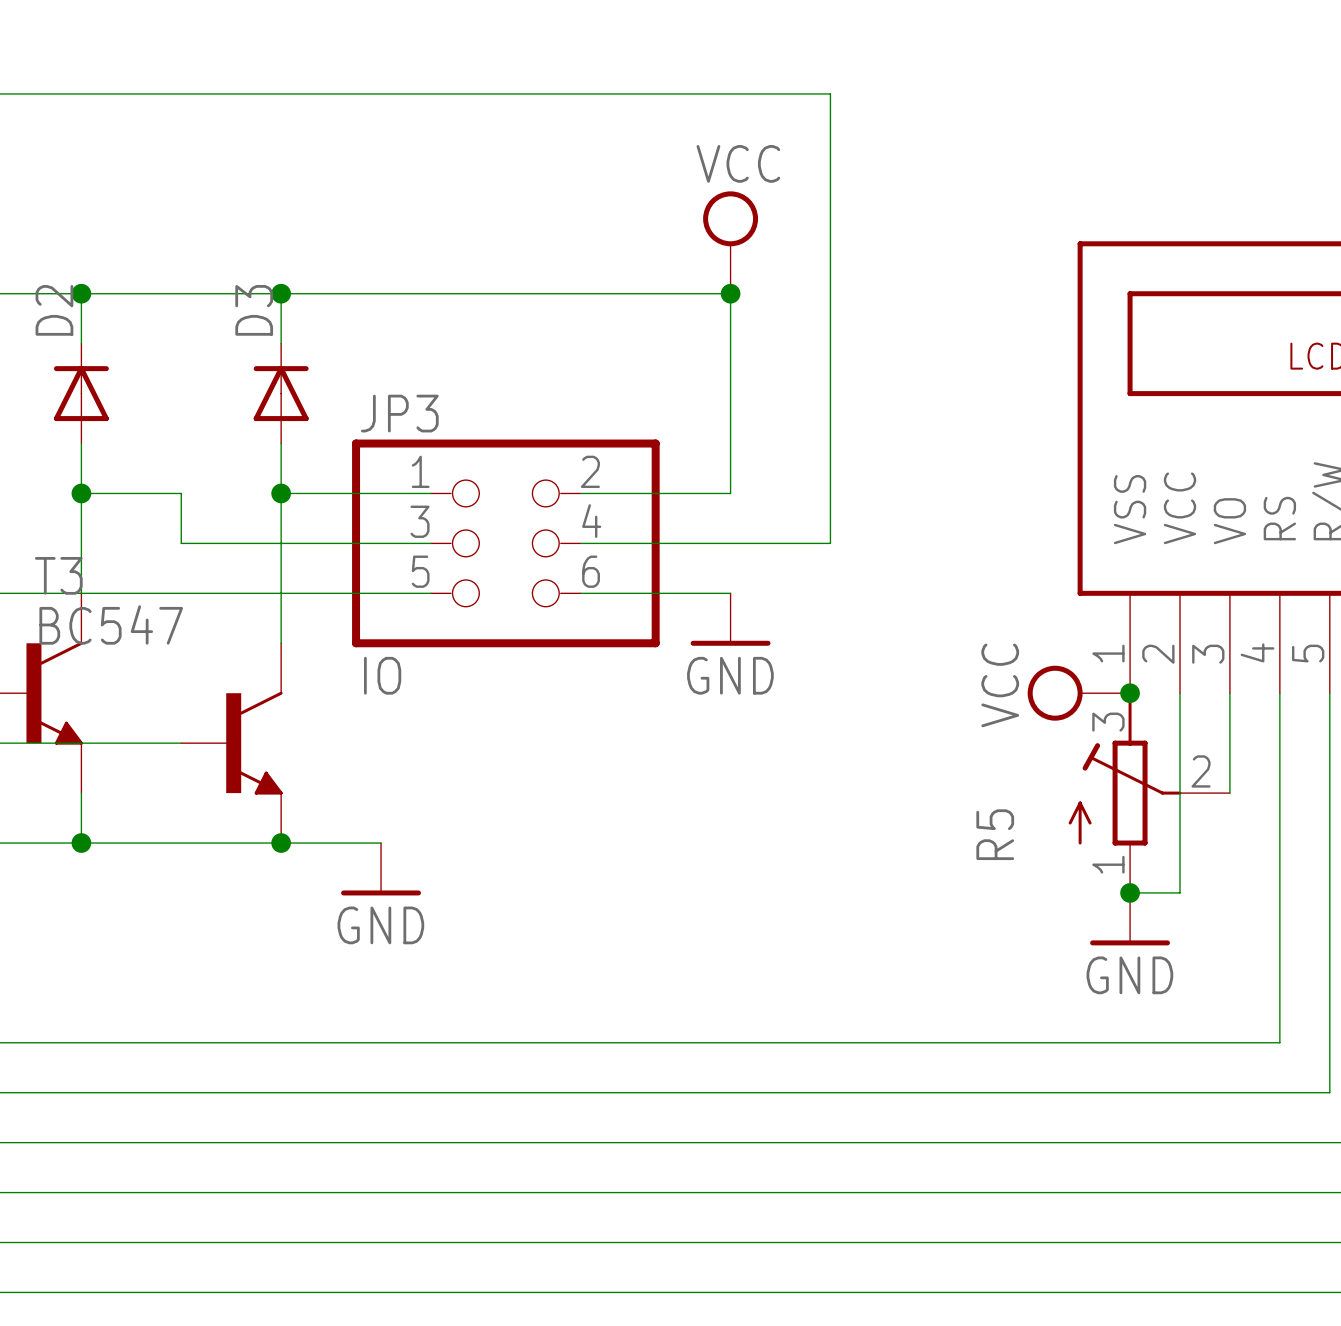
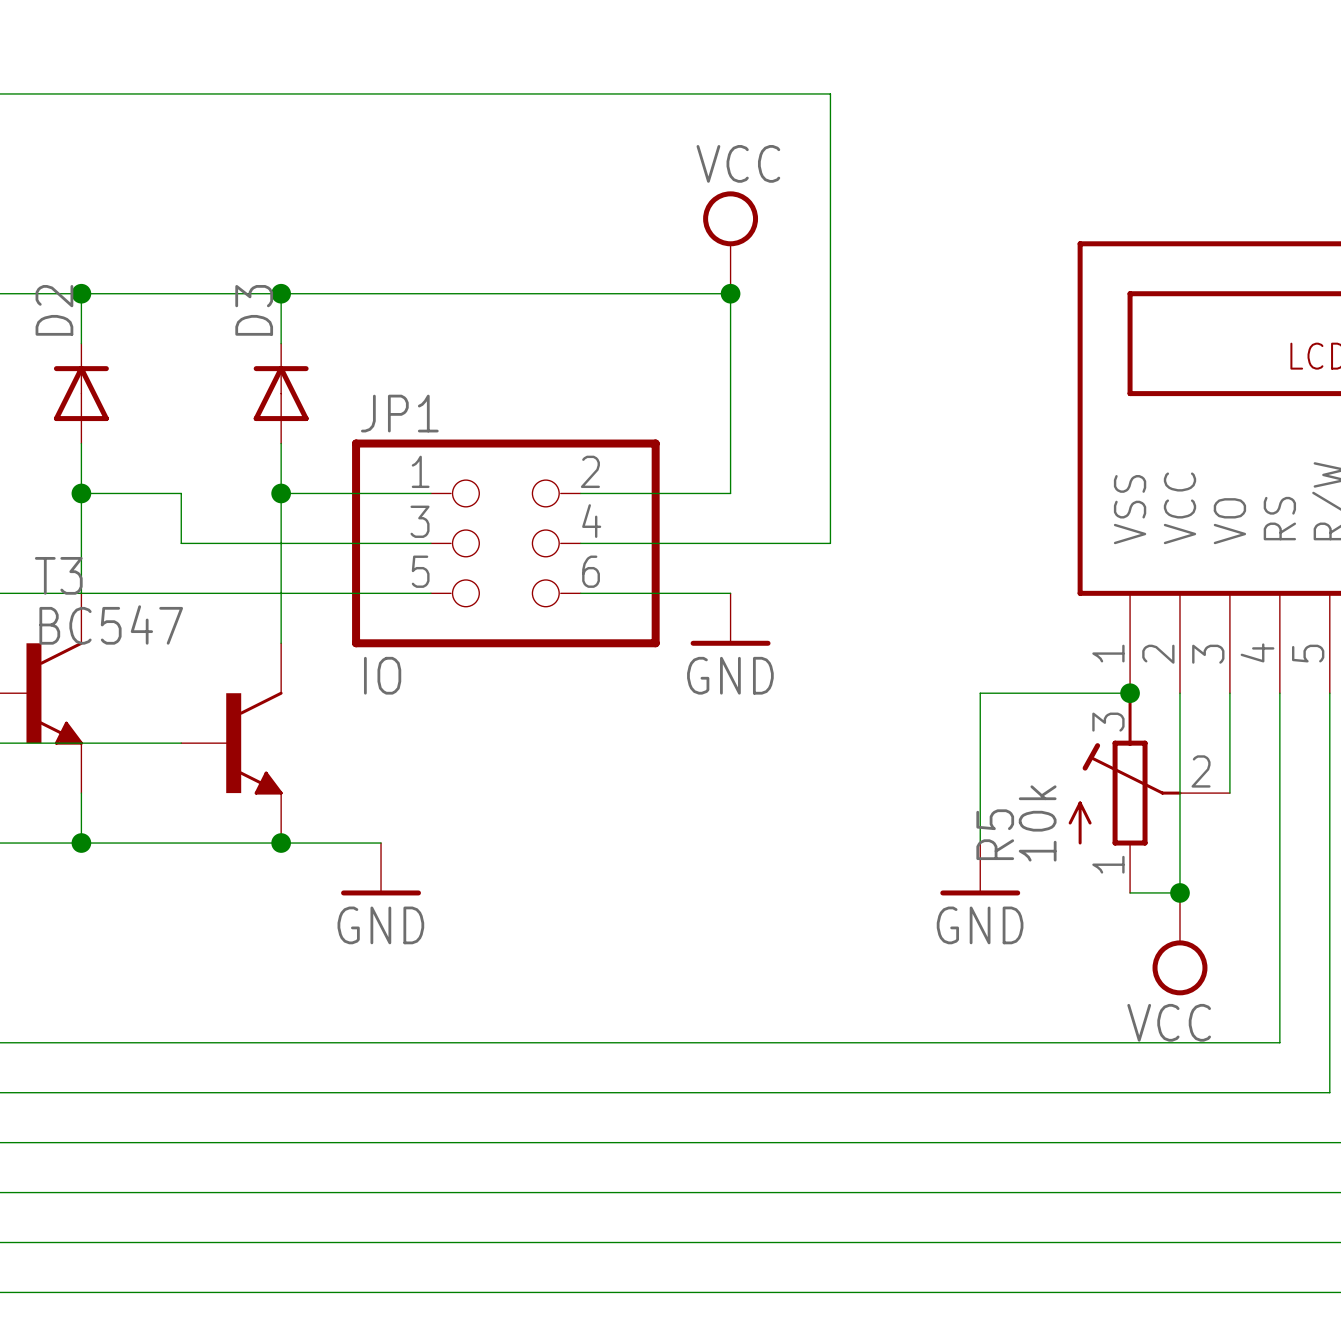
JP3 name: JP3 (399, 413) -> JP1 (399, 413)
power symbol rotation: 0° (1055, 693) -> 90° counterclockwise (1179, 967)
power symbol position: VCC (1078, 693) -> VCC (1179, 944)
wire: none -> (1130, 693) (980, 693) (980, 843)
R5 value: none -> 10k (1037, 823)
junction position: (1130, 892) -> (1179, 892)
power symbol position: GND (1130, 919) -> GND (980, 869)

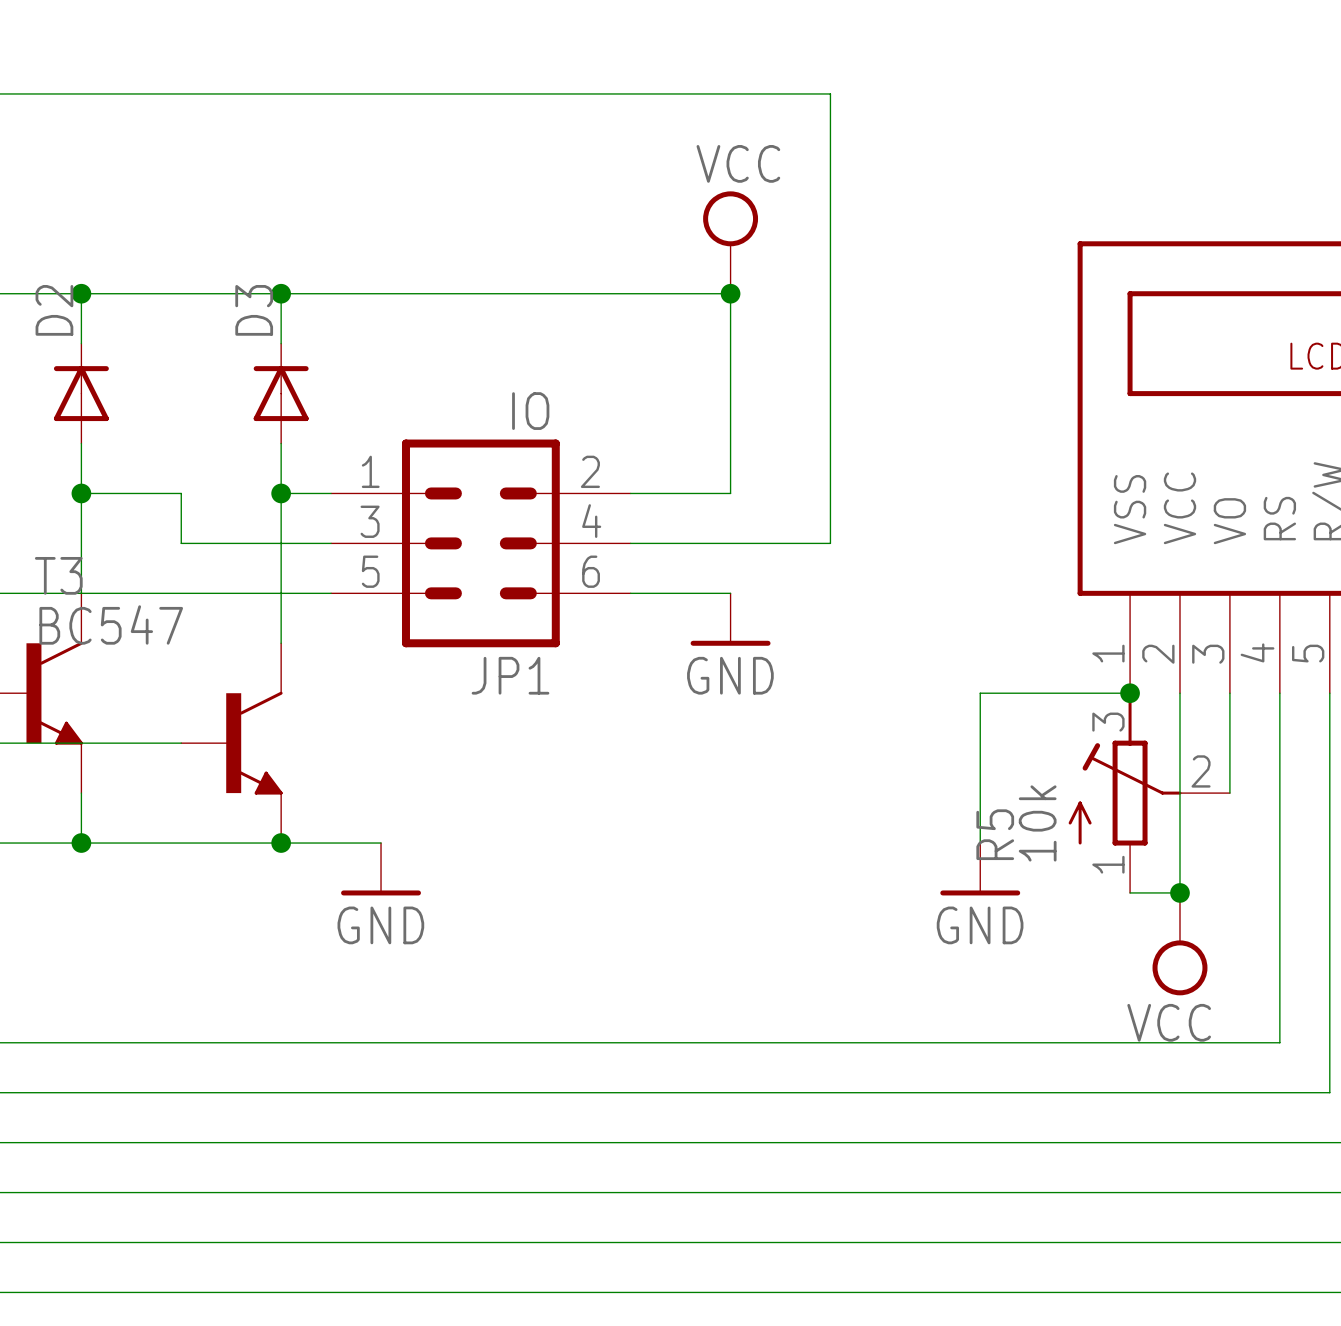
JP1 name position: JP1 (399, 413) -> JP1 (510, 675)
JP1 symbol: [352, 439, 660, 648] -> [331, 439, 631, 648]
JP1 value position: IO (382, 675) -> IO (530, 411)

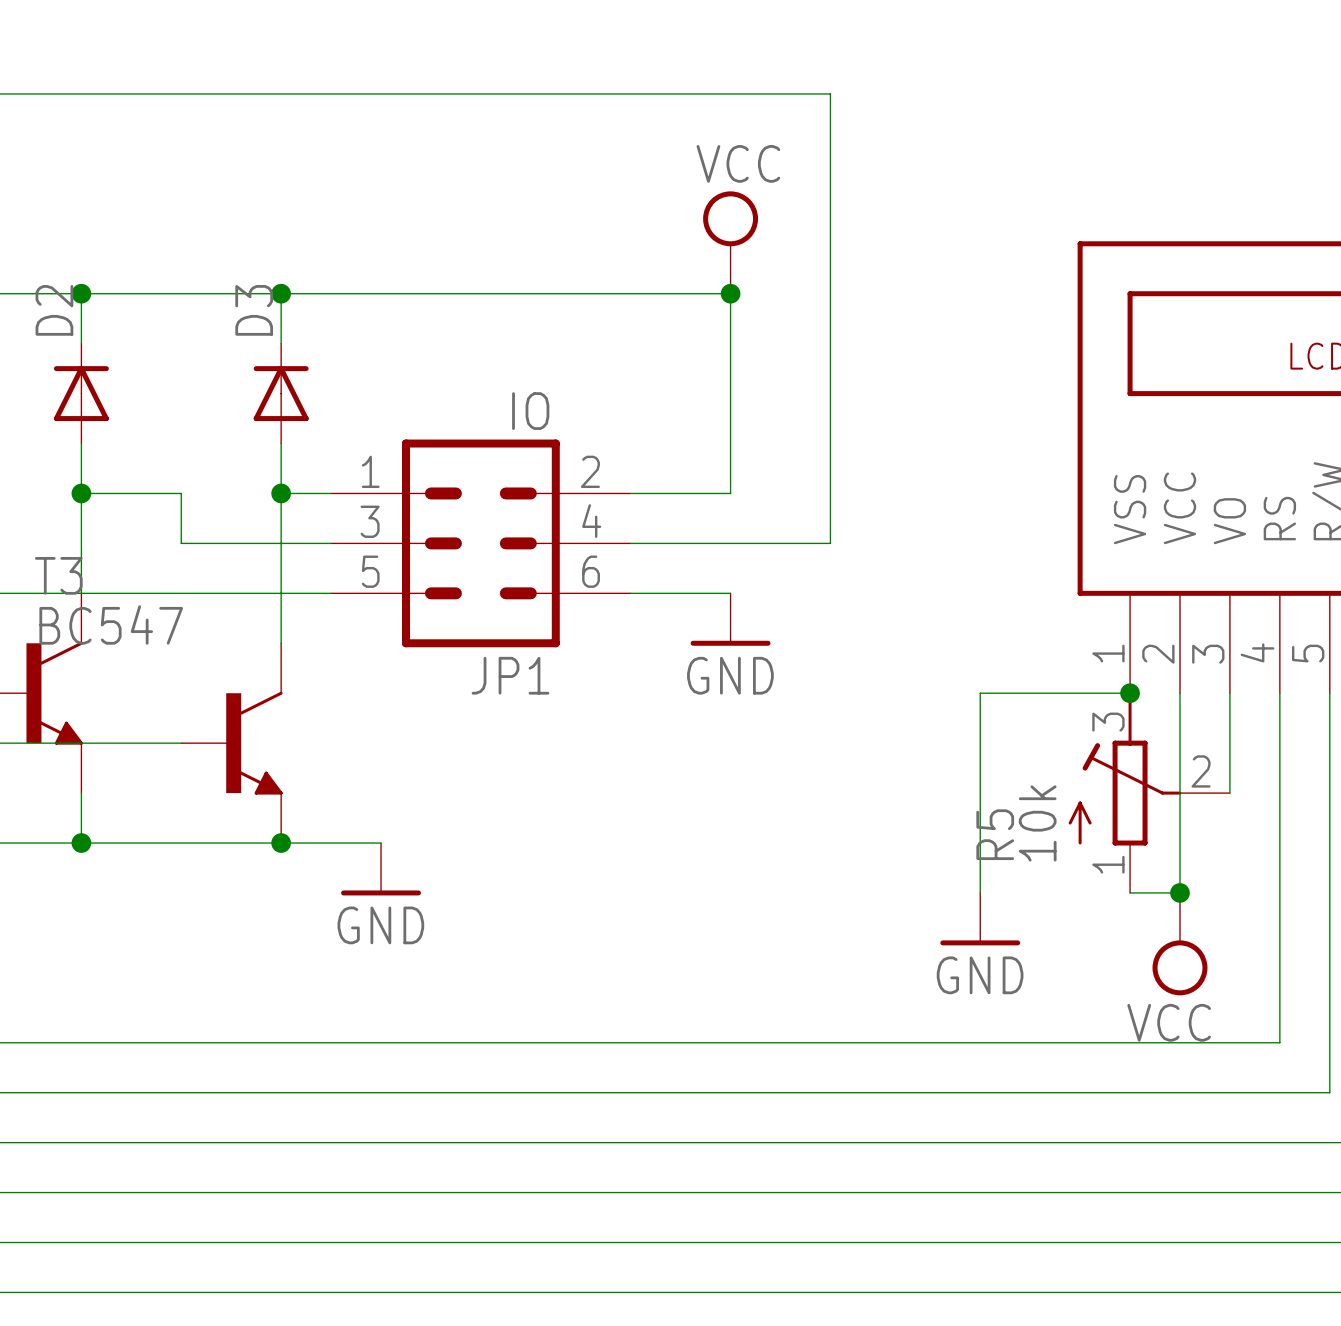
power symbol position: GND (980, 869) -> GND (980, 919)

